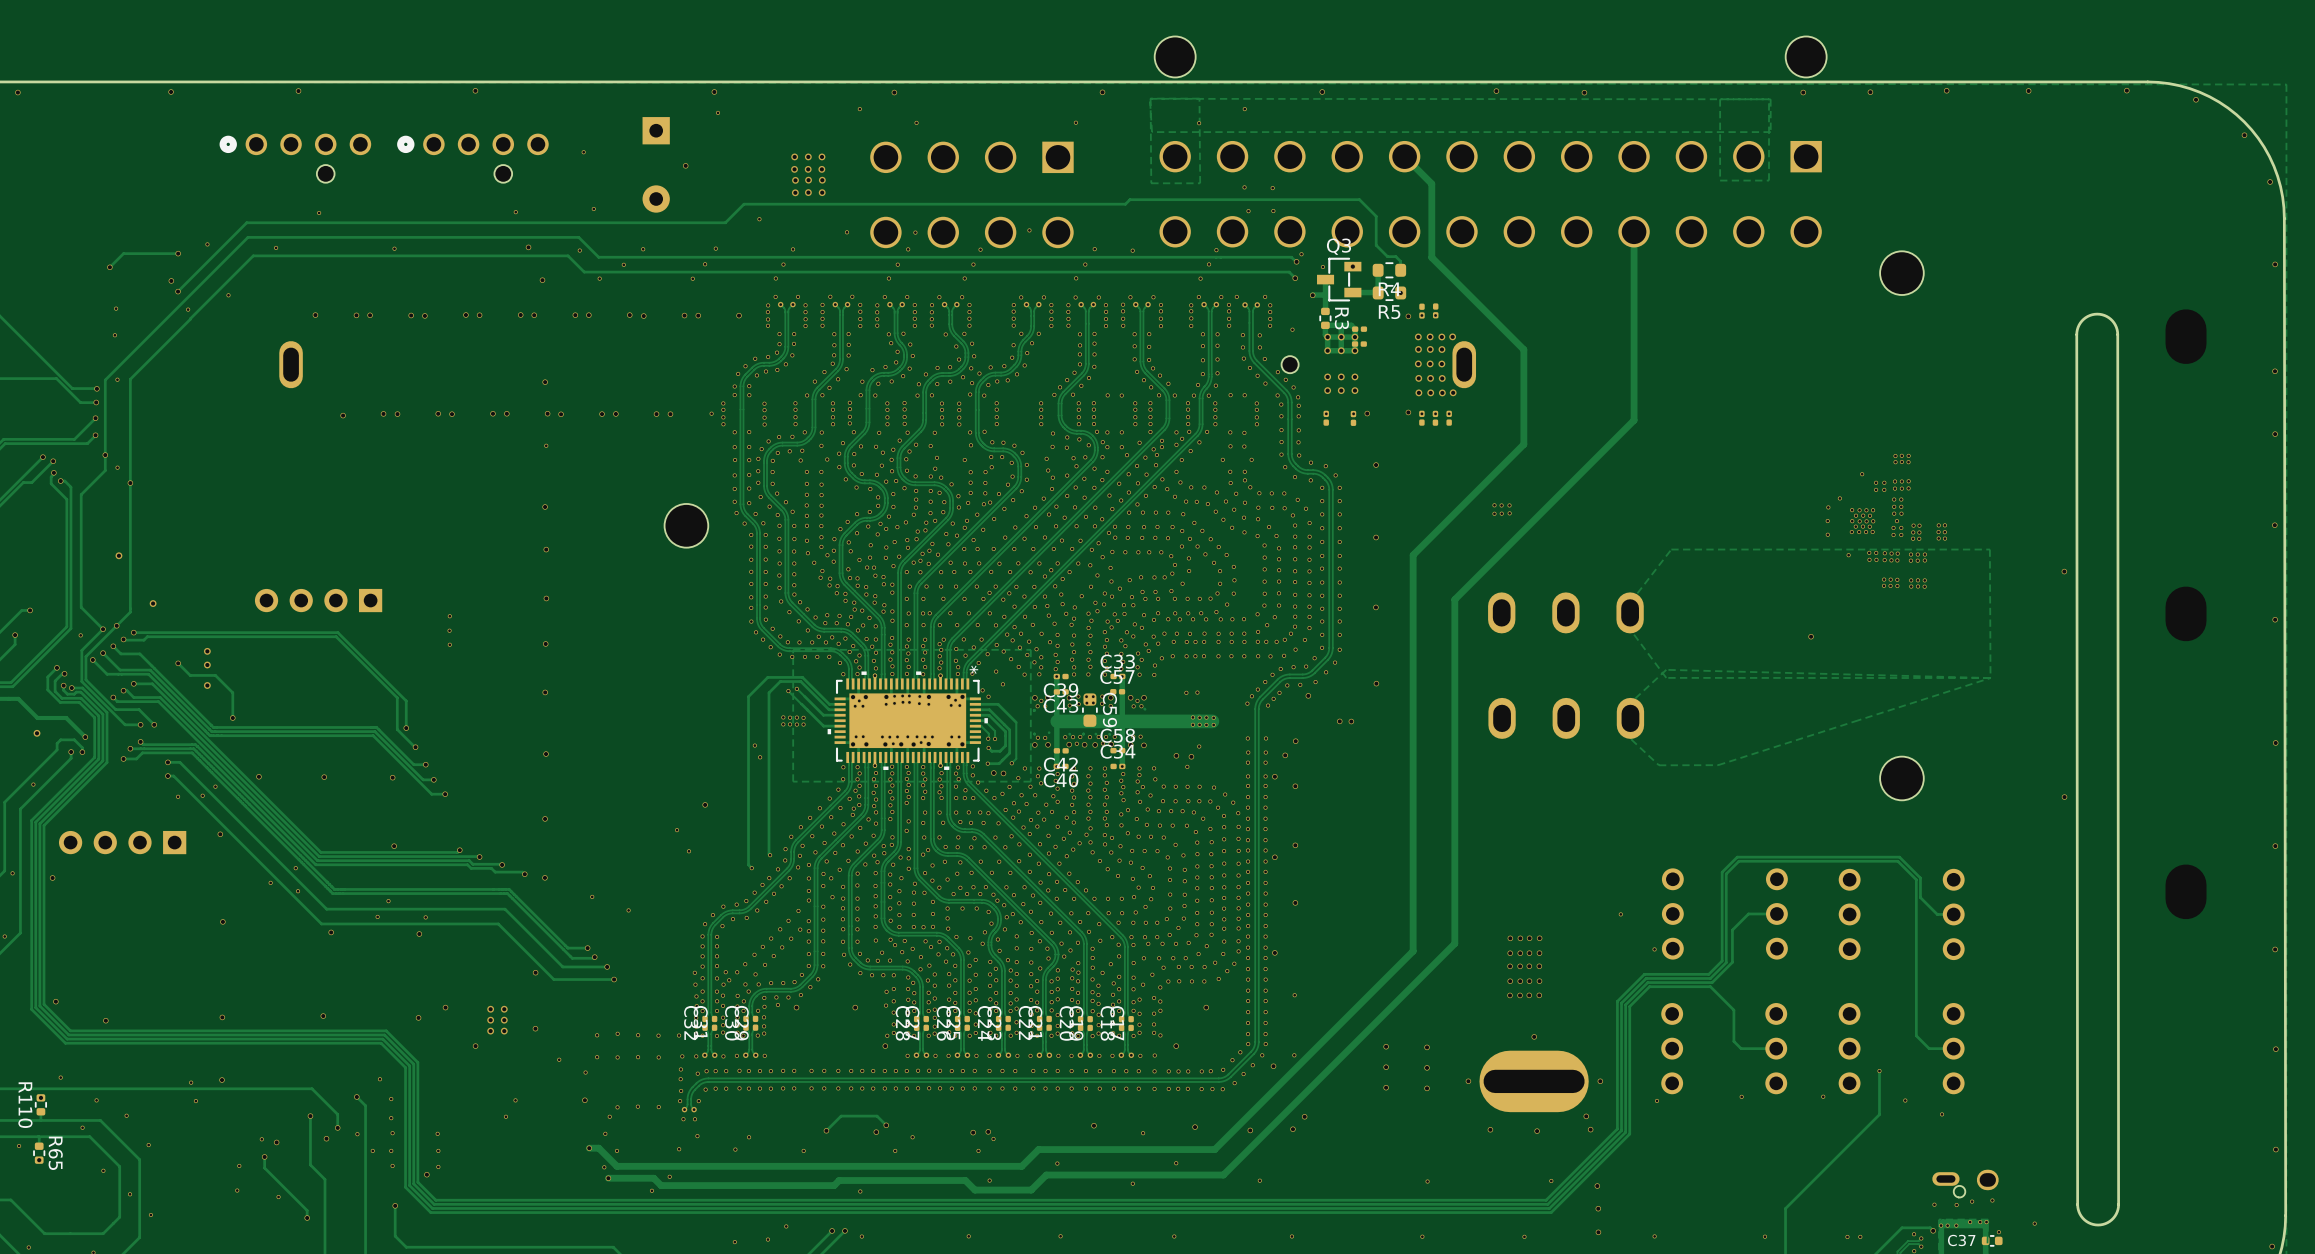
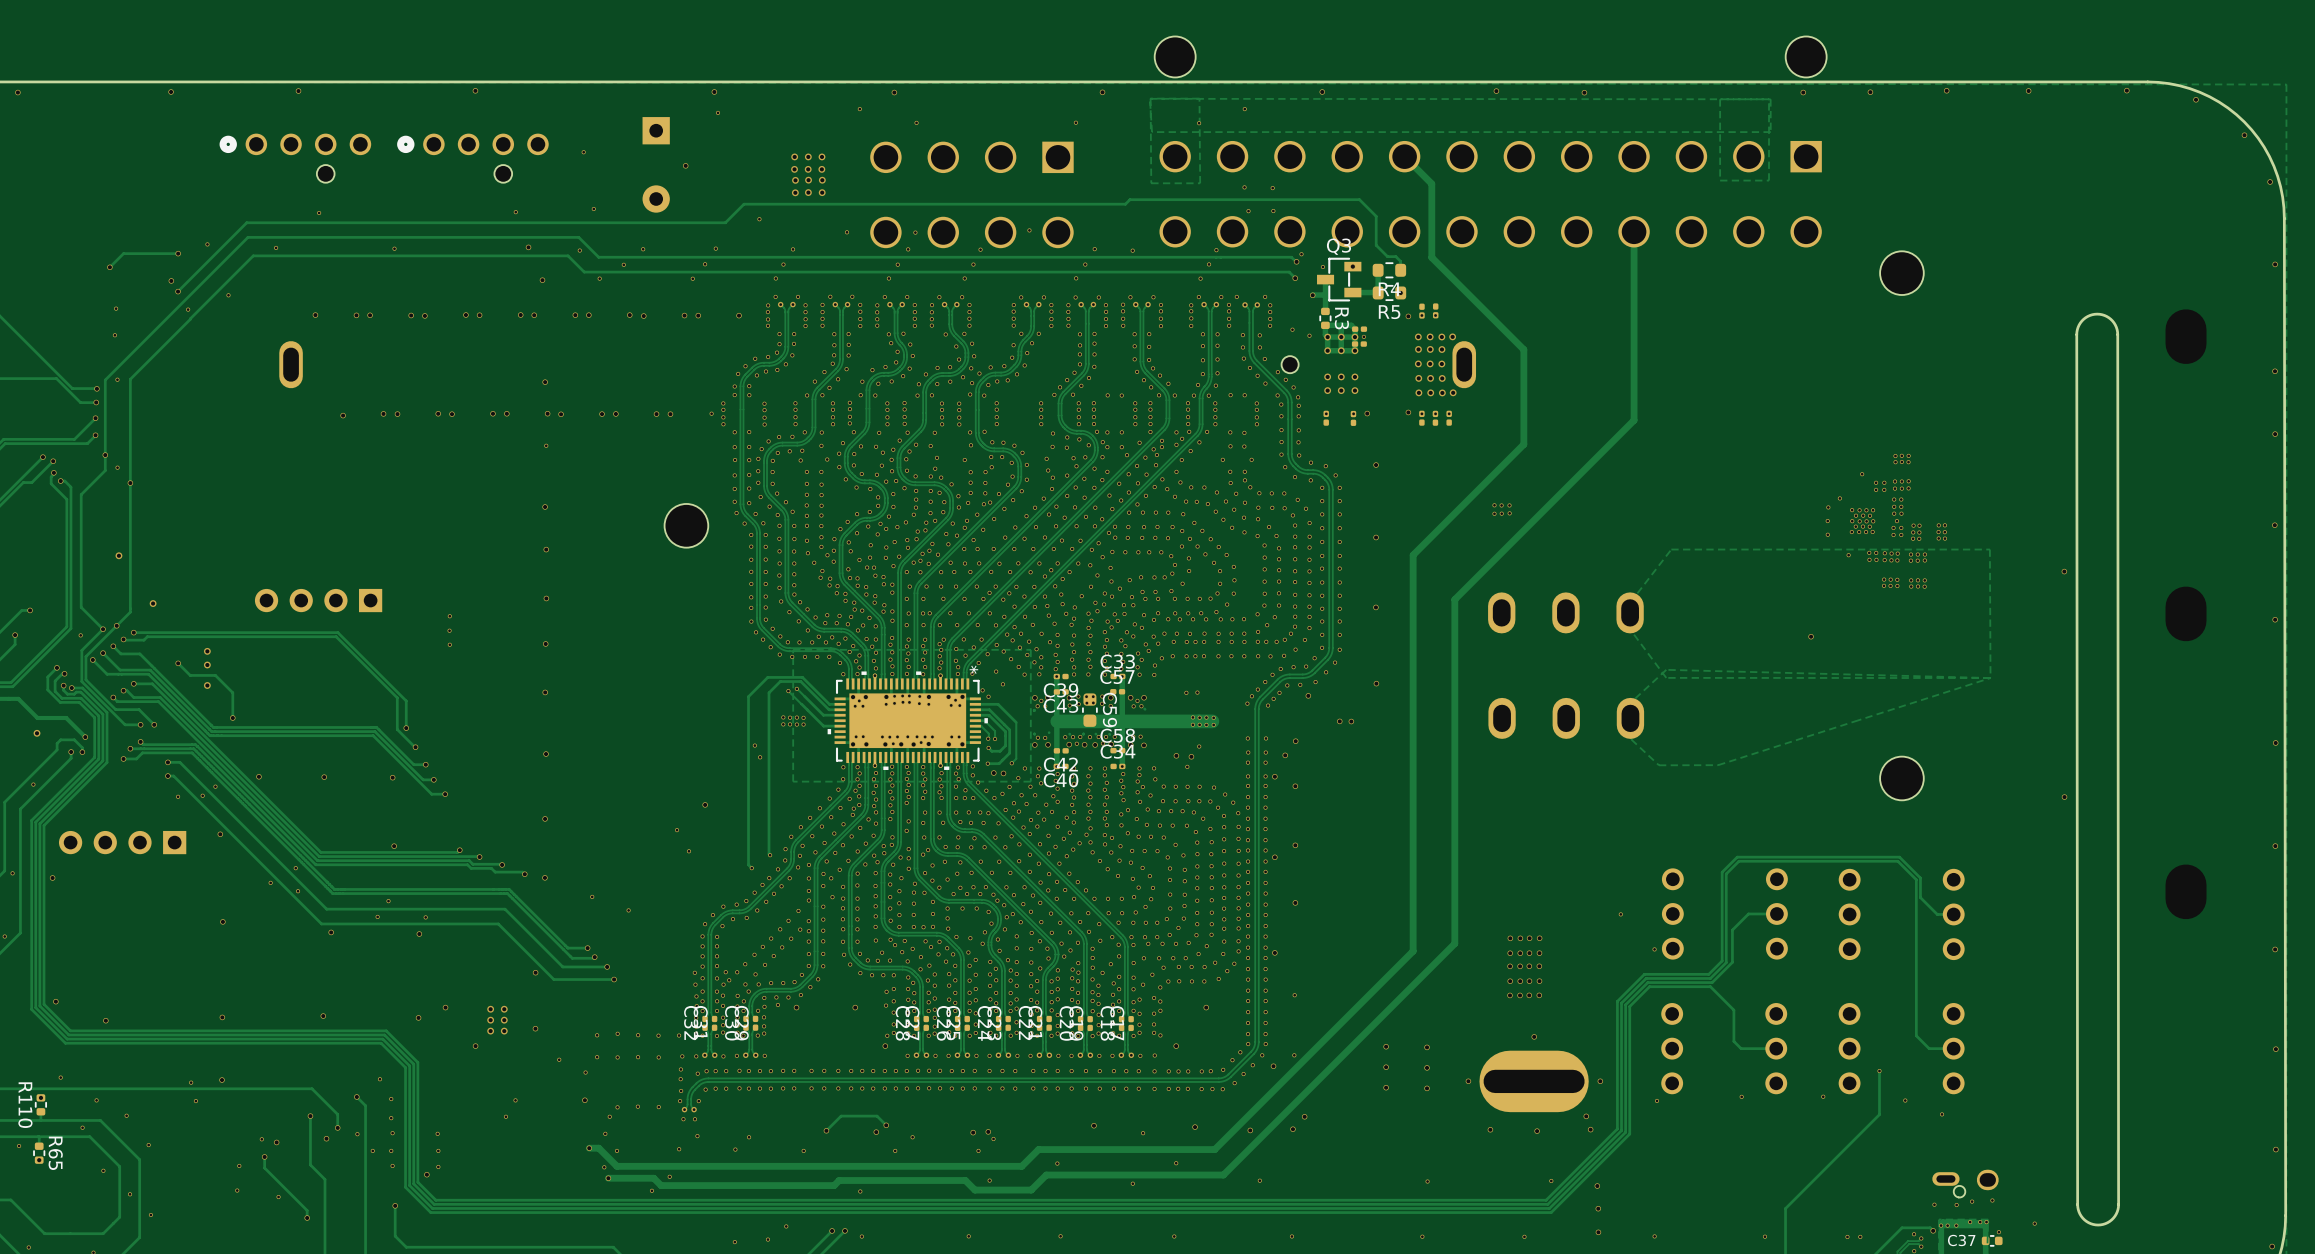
via: none -> (1309, 335)
via: none -> (1363, 336)

